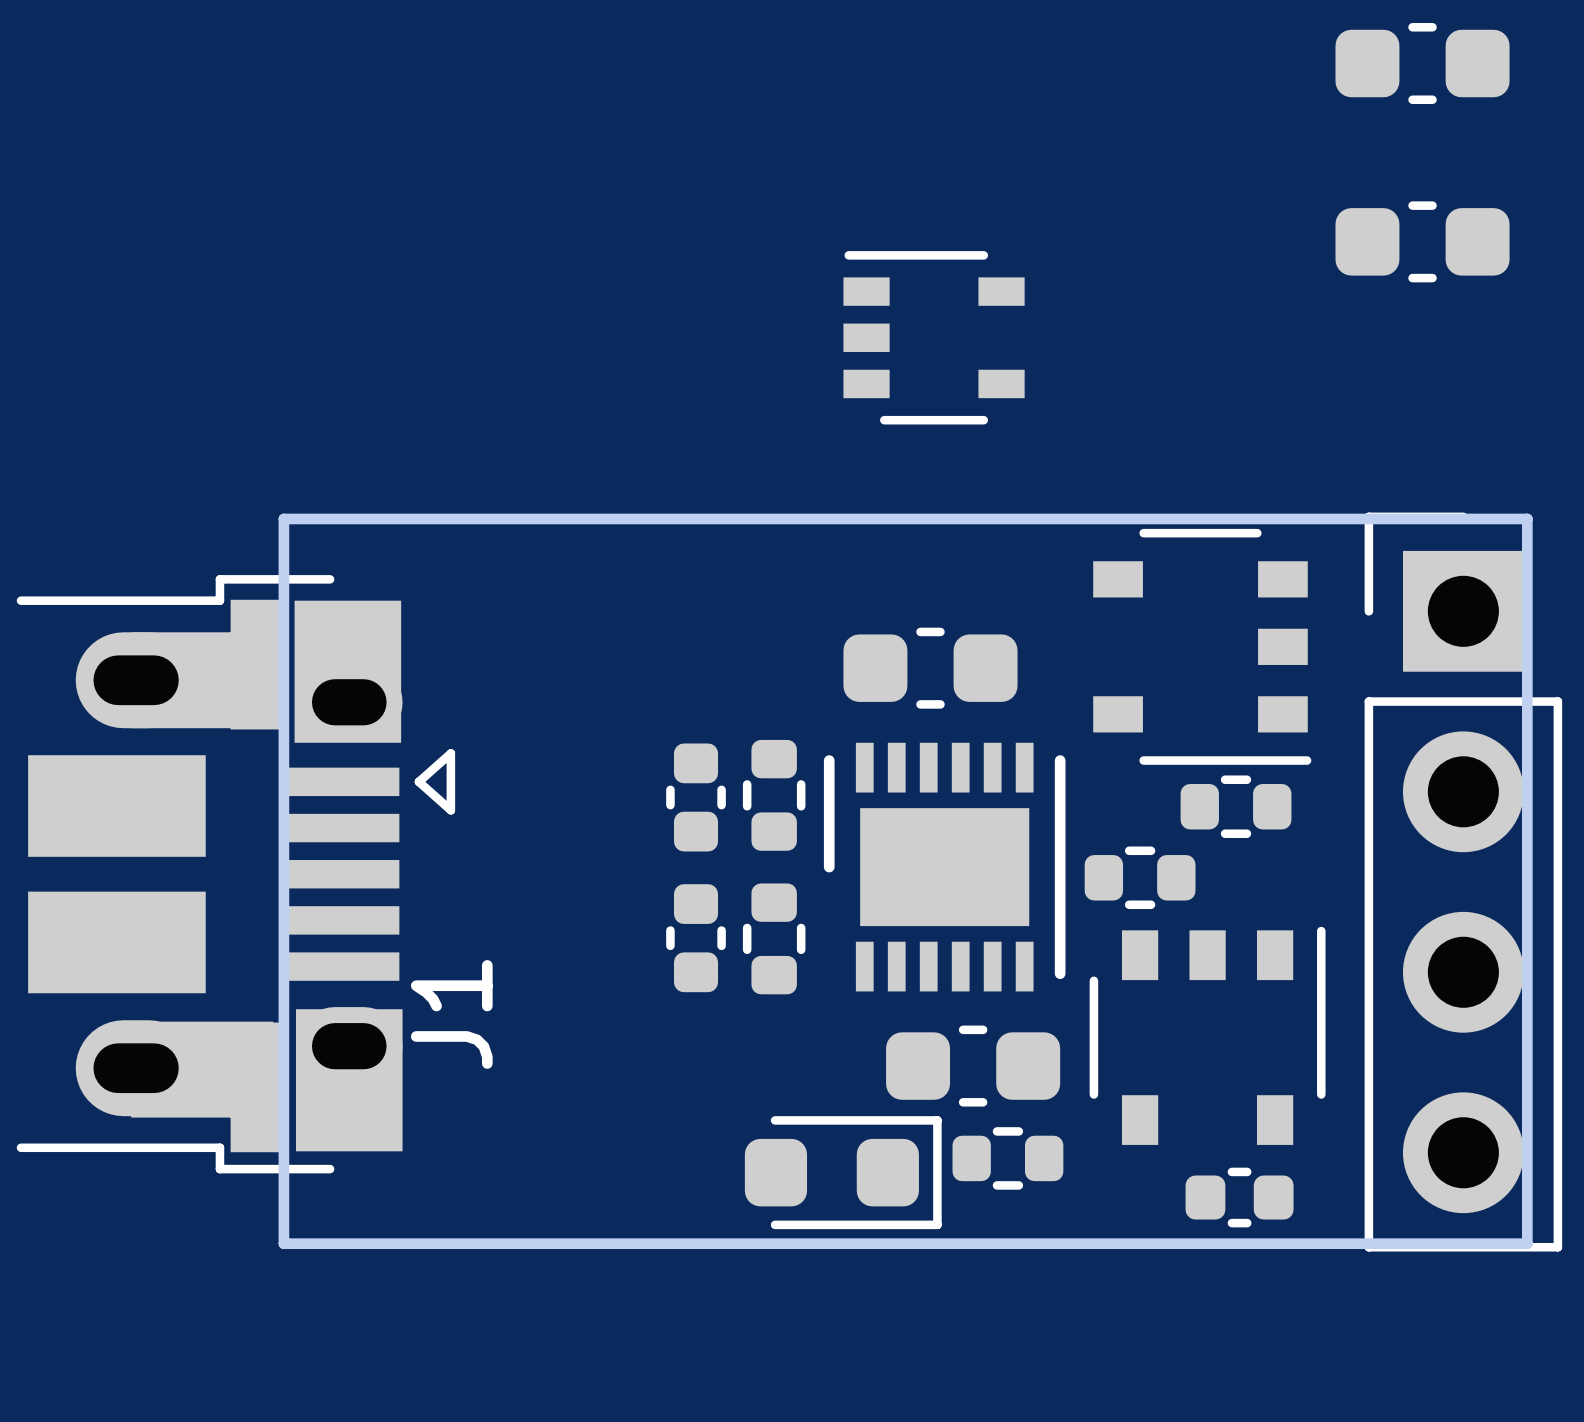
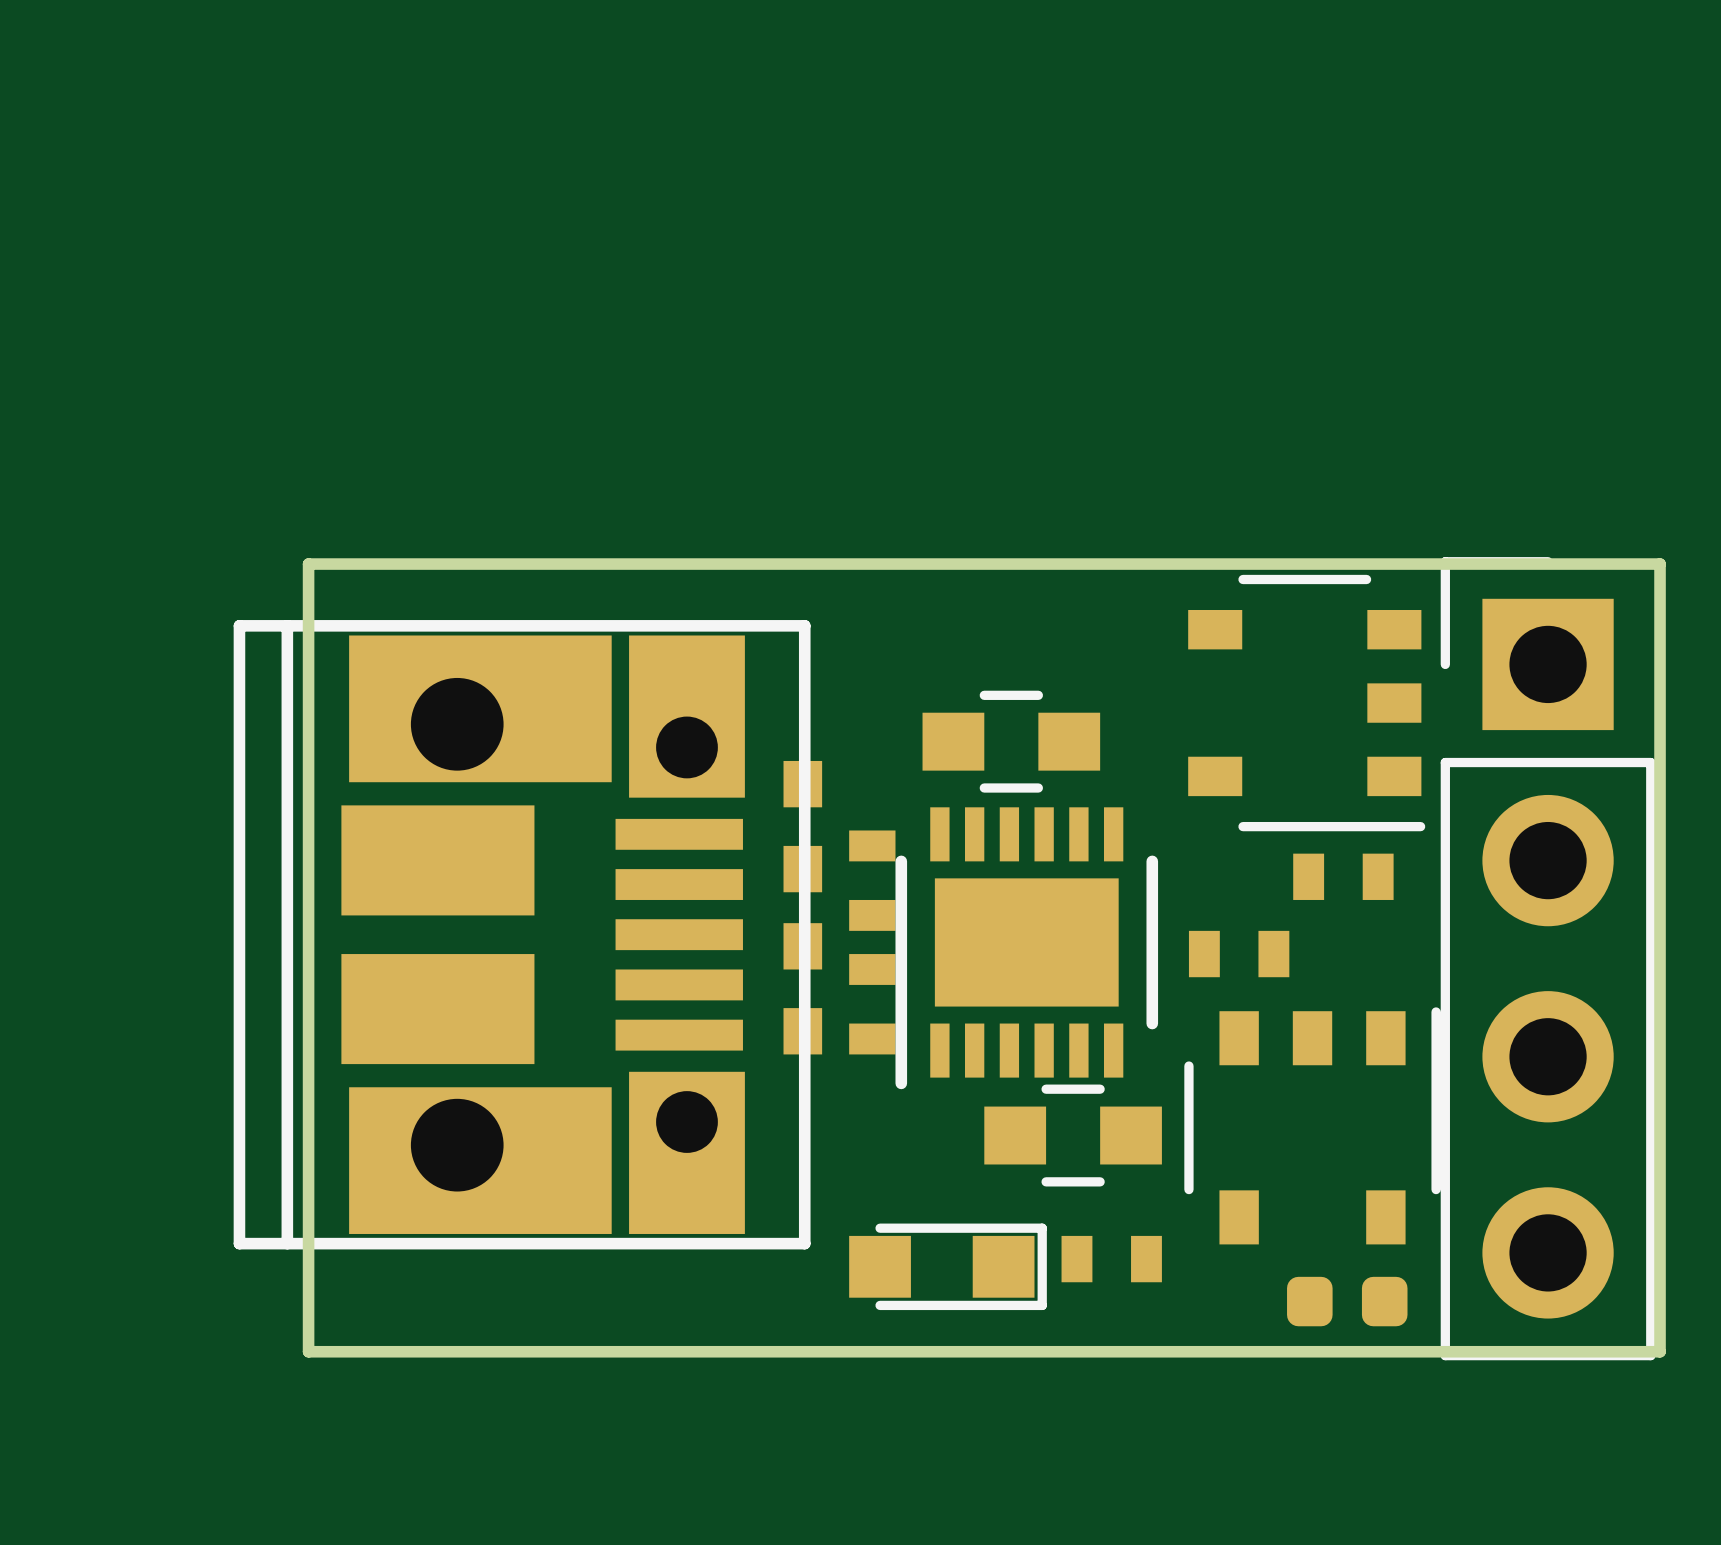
part: (1422, 63) -> none
part: (1422, 241) -> none
part: (934, 337) -> none
part footprint: [843, 627, 1018, 709] -> [922, 690, 1101, 793]
part footprint: [823, 742, 1066, 992] -> [895, 807, 1159, 1090]
part: none -> (802, 826)
part footprint: [1180, 775, 1292, 838] -> [1293, 853, 1394, 900]
part: (774, 795) -> none
part: (696, 797) -> none
part: none -> (872, 880)
part footprint: [1084, 846, 1196, 910] -> [1188, 930, 1290, 978]
part: none -> (522, 934)
J1: (235, 874) -> none
part position: (1463, 882) -> (1548, 958)
part: none -> (802, 988)
part: none -> (872, 1004)
part: (696, 938) -> none
part: (774, 938) -> none
part footprint: [886, 1025, 1061, 1107] -> [984, 1084, 1162, 1187]
part footprint: [744, 1116, 942, 1230] -> [849, 1223, 1047, 1311]
part footprint: [952, 1127, 1064, 1190] -> [1061, 1235, 1162, 1283]
part footprint: [1185, 1167, 1294, 1228] -> [1287, 1276, 1408, 1327]

